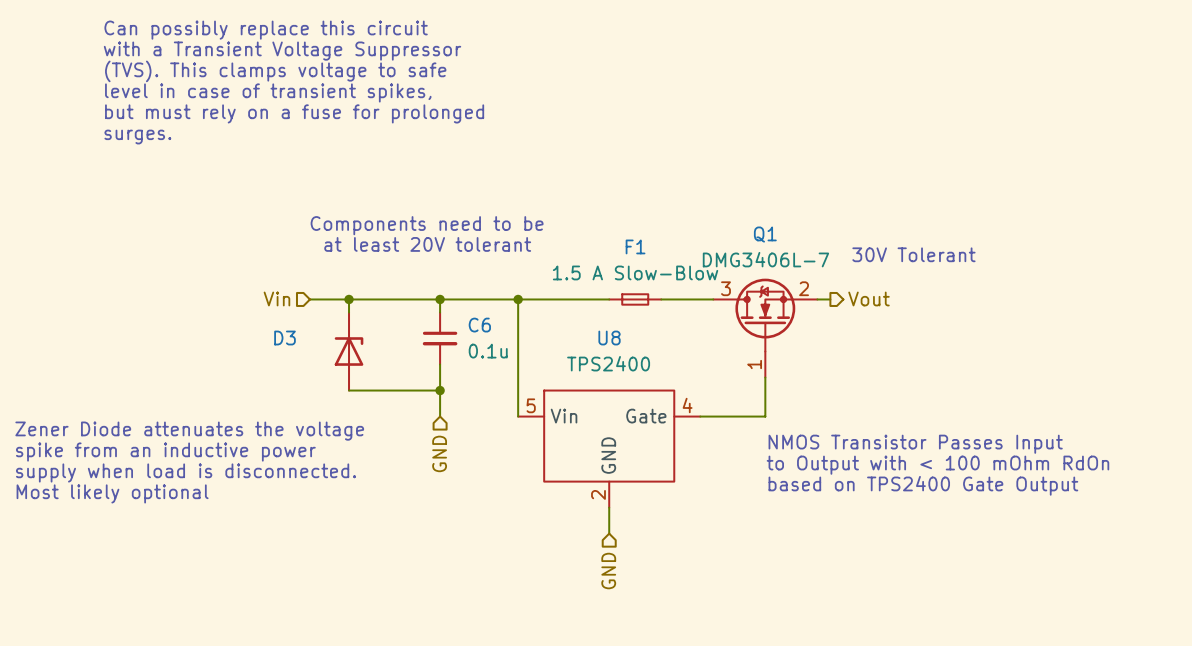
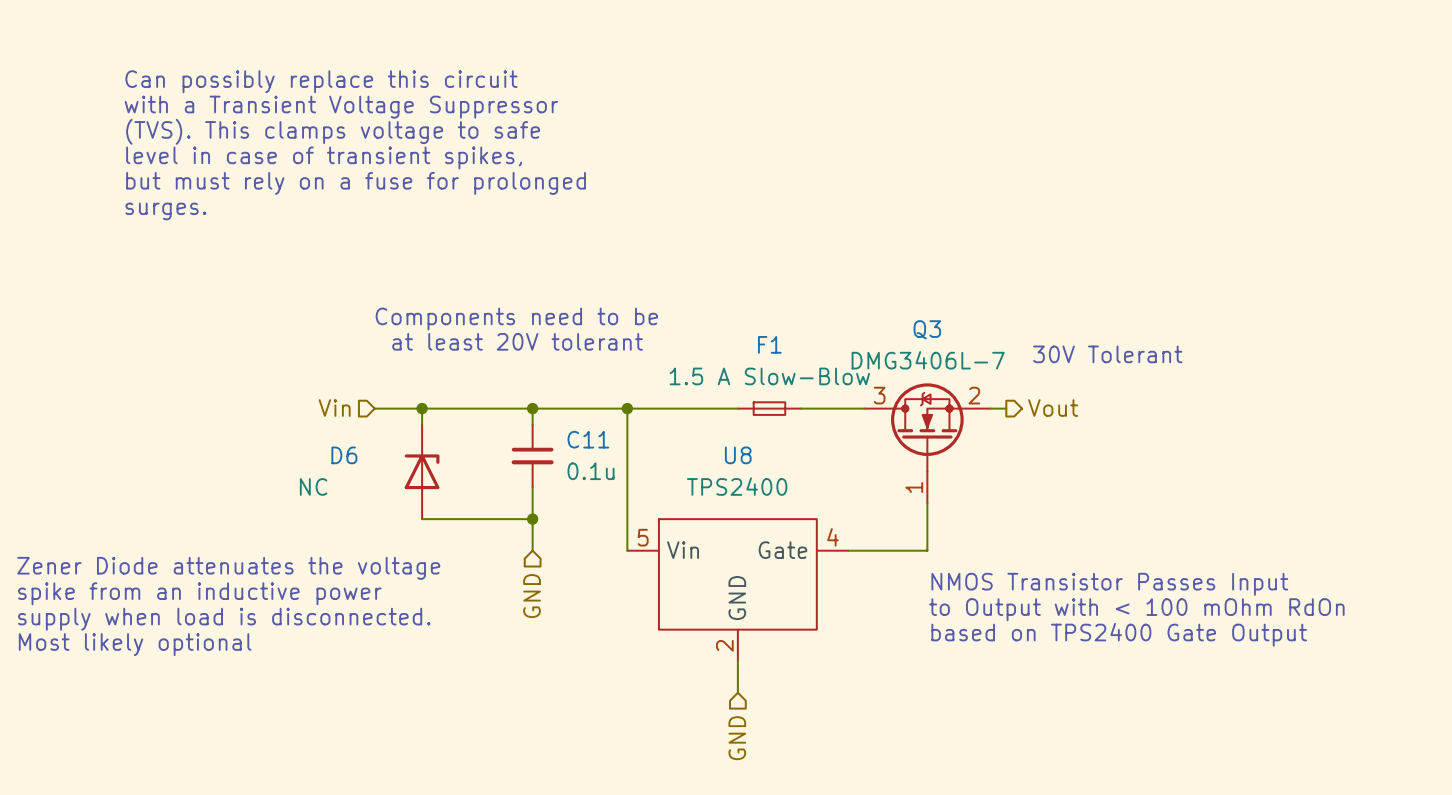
Q1 name: Q1 (765, 234) -> Q3 (927, 329)
C6 name: C6 (479, 325) -> C11 (588, 439)
D3 name: D3 (285, 338) -> D6 (344, 455)
D3 value: none -> NC (313, 486)

